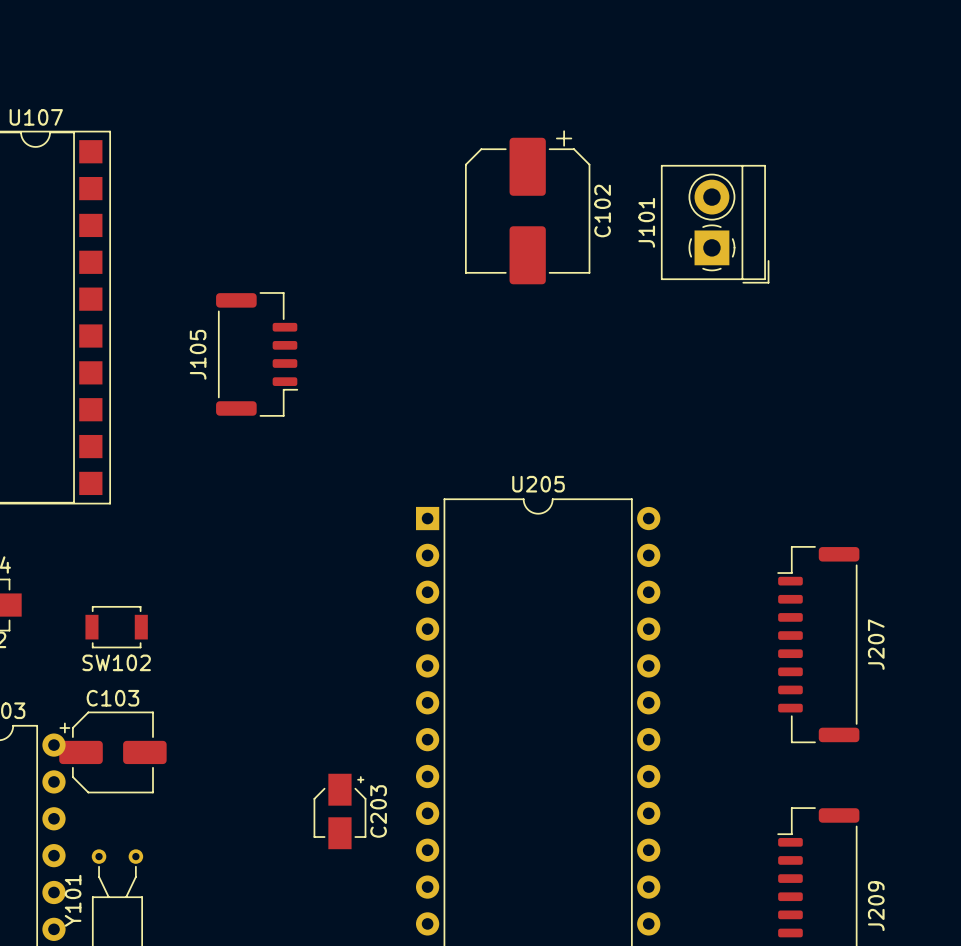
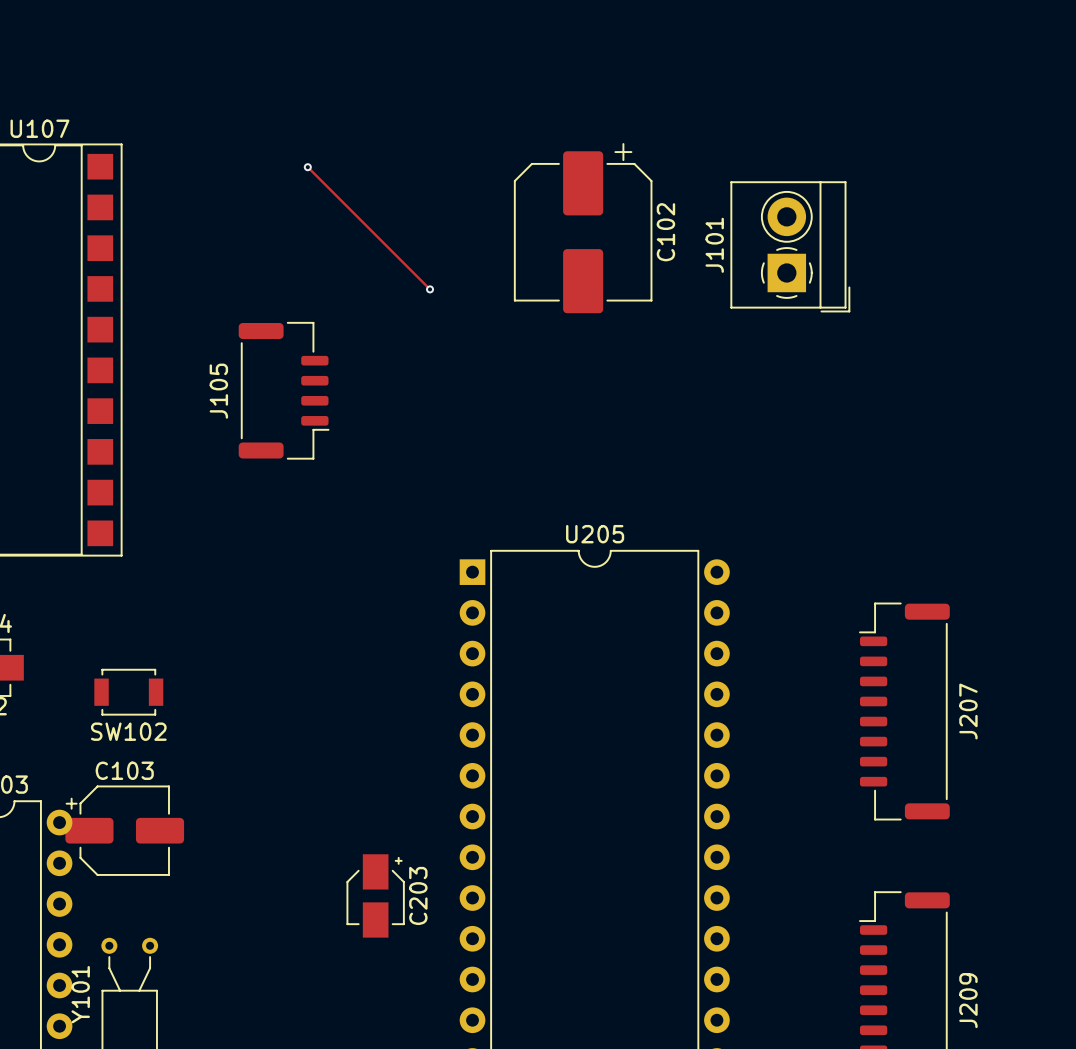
track: none -> (307, 167) (430, 289)
via: none -> (307, 167)
via: none -> (430, 289)

